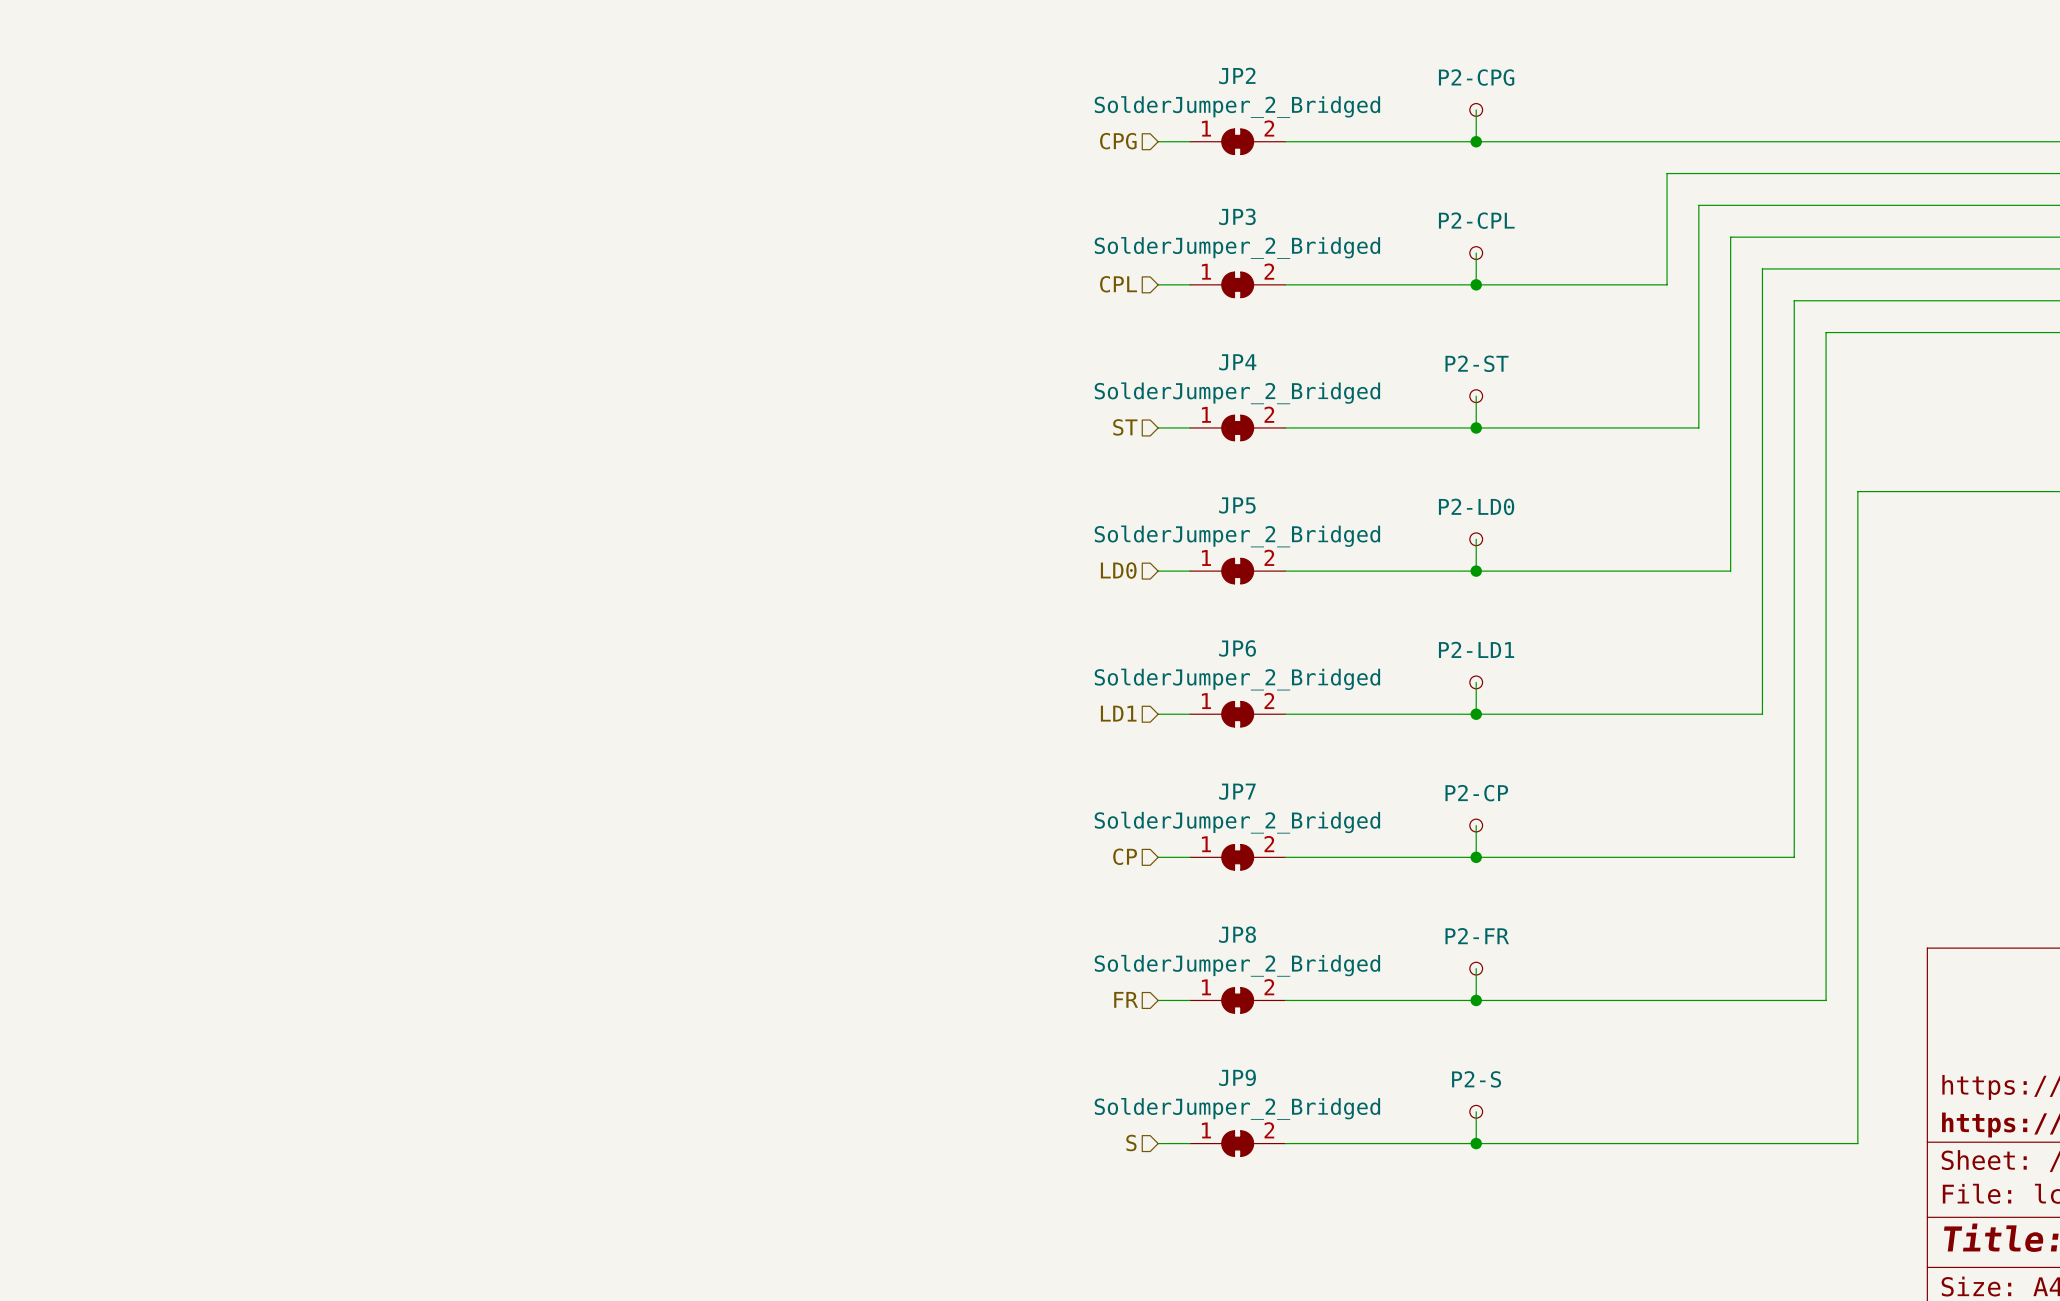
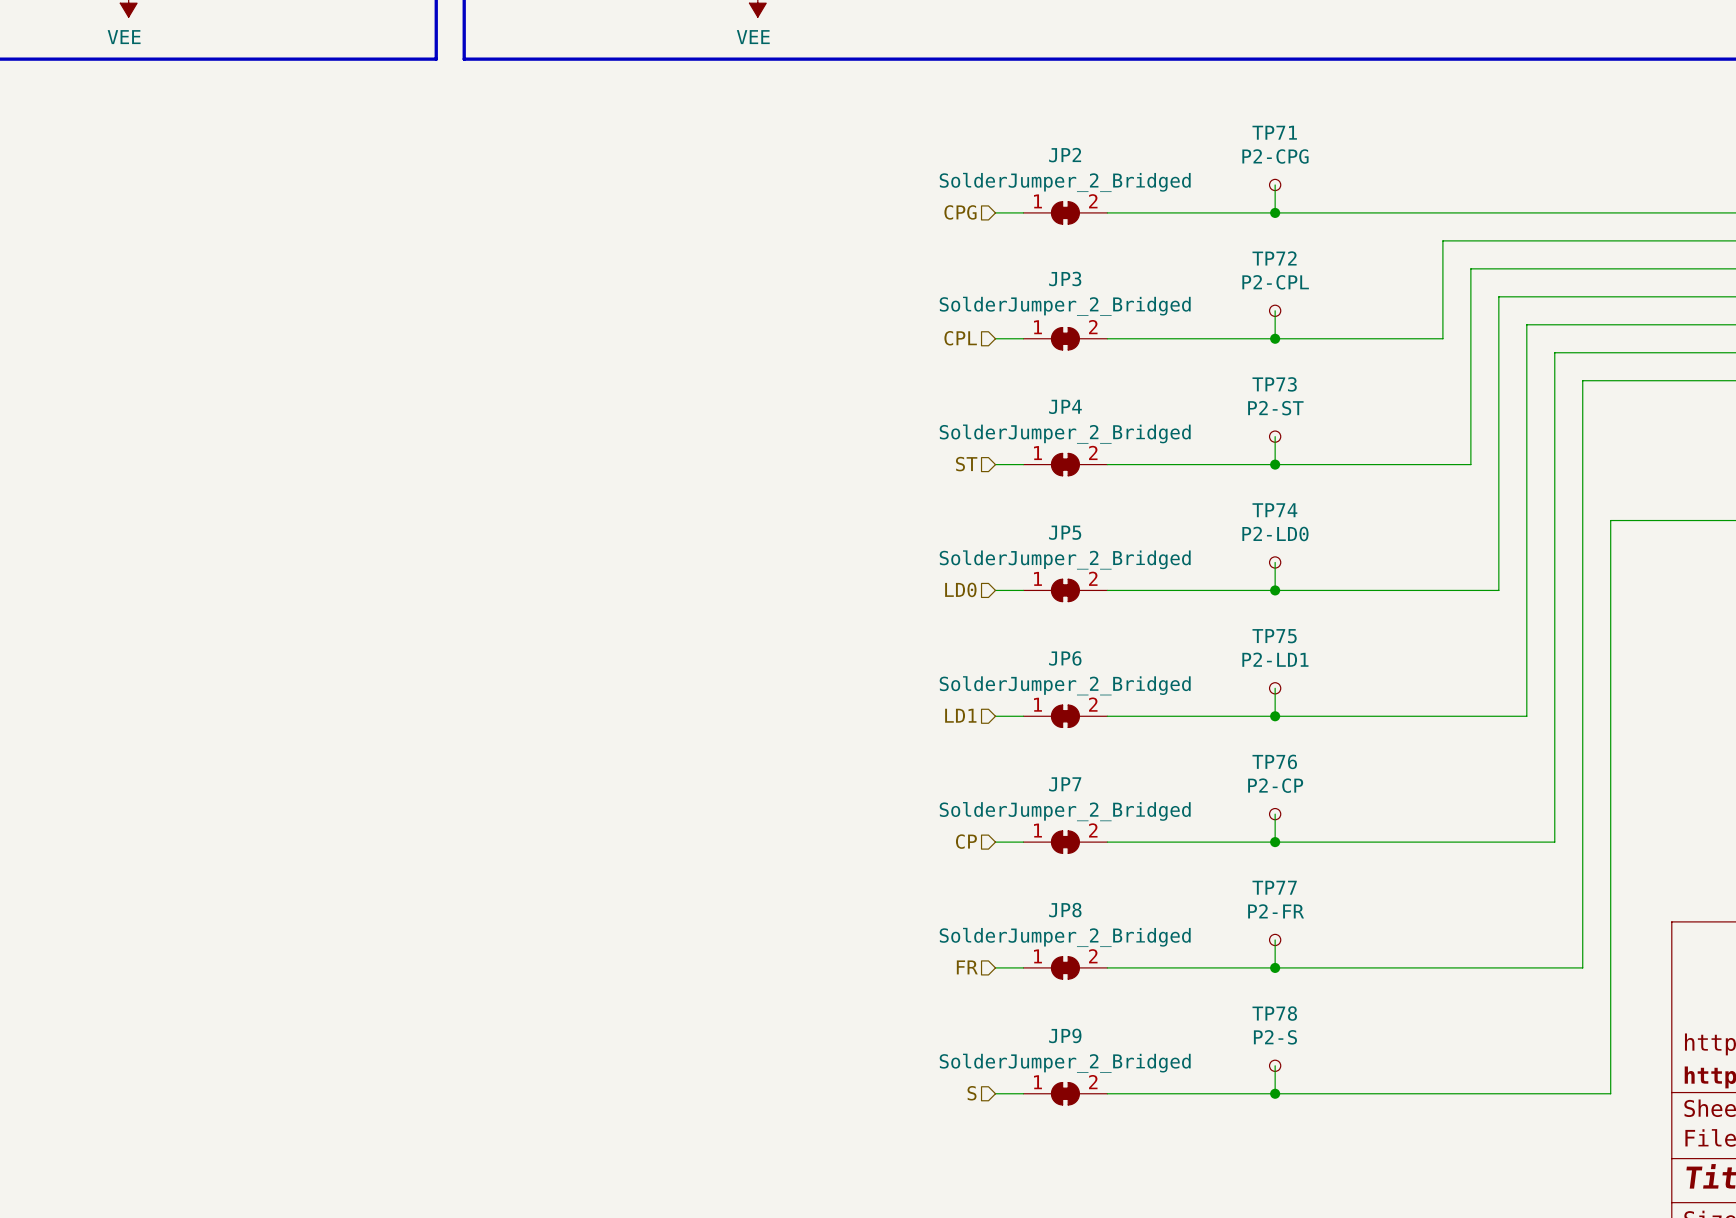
TP71 name: none -> TP71 (1274, 132)
TP72 name: none -> TP72 (1274, 258)
TP73 name: none -> TP73 (1274, 384)
TP74 name: none -> TP74 (1274, 510)
TP75 name: none -> TP75 (1274, 636)
TP76 name: none -> TP76 (1274, 761)
TP77 name: none -> TP77 (1274, 887)
TP78 name: none -> TP78 (1274, 1013)

